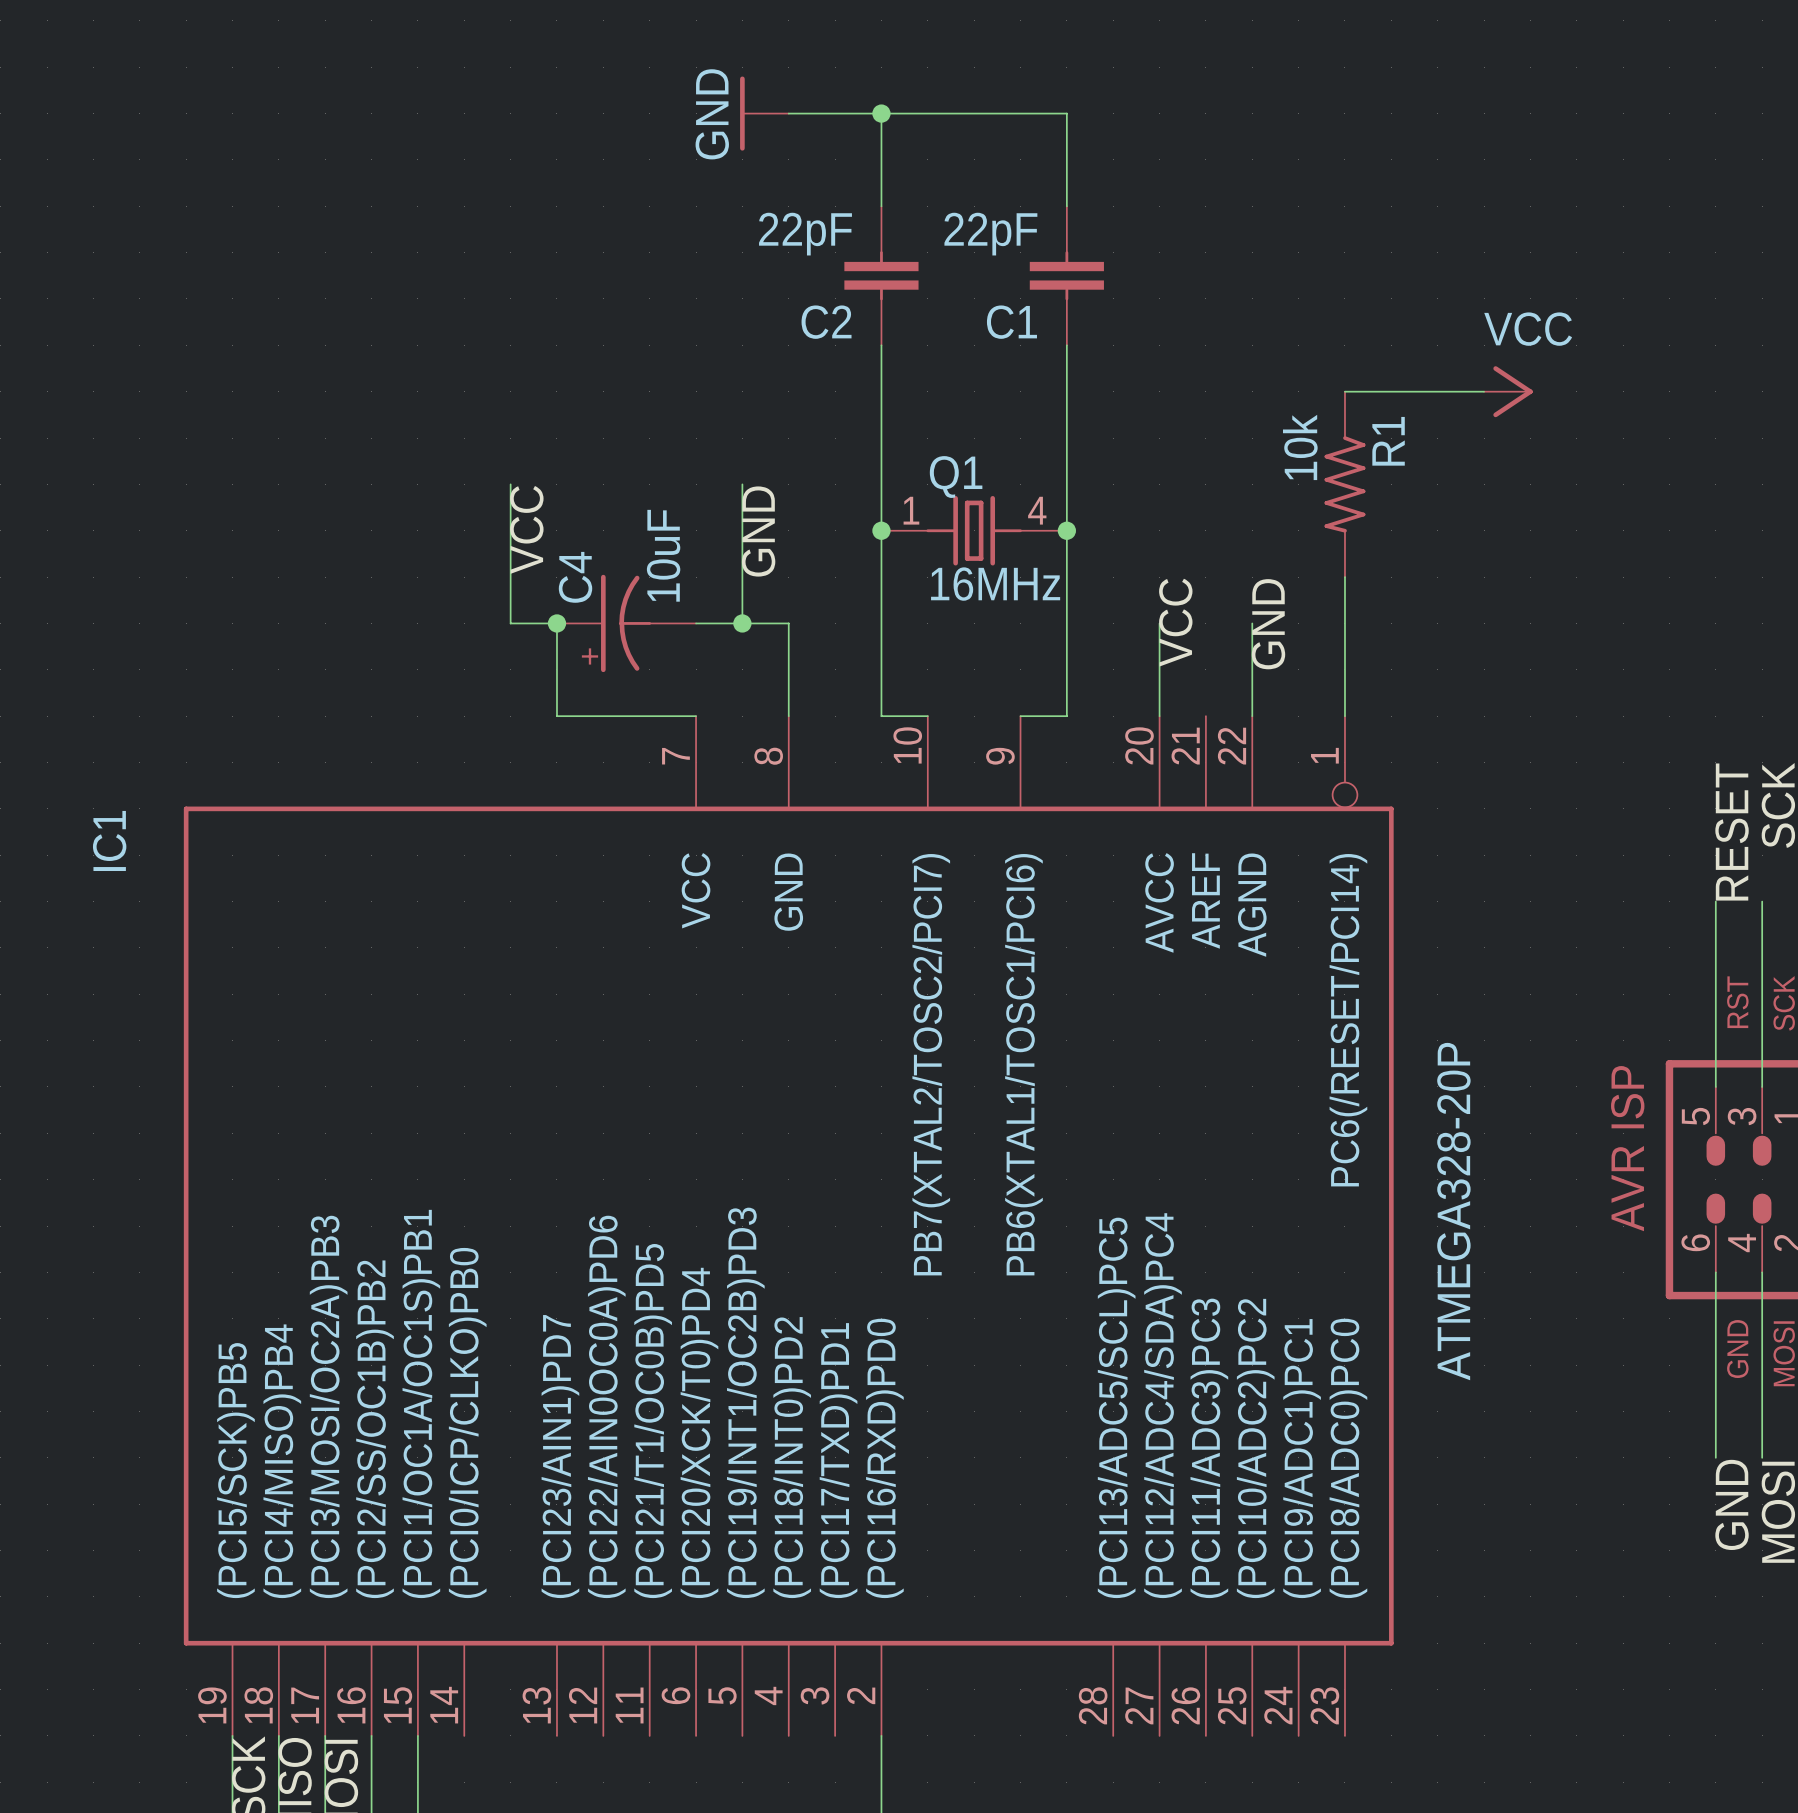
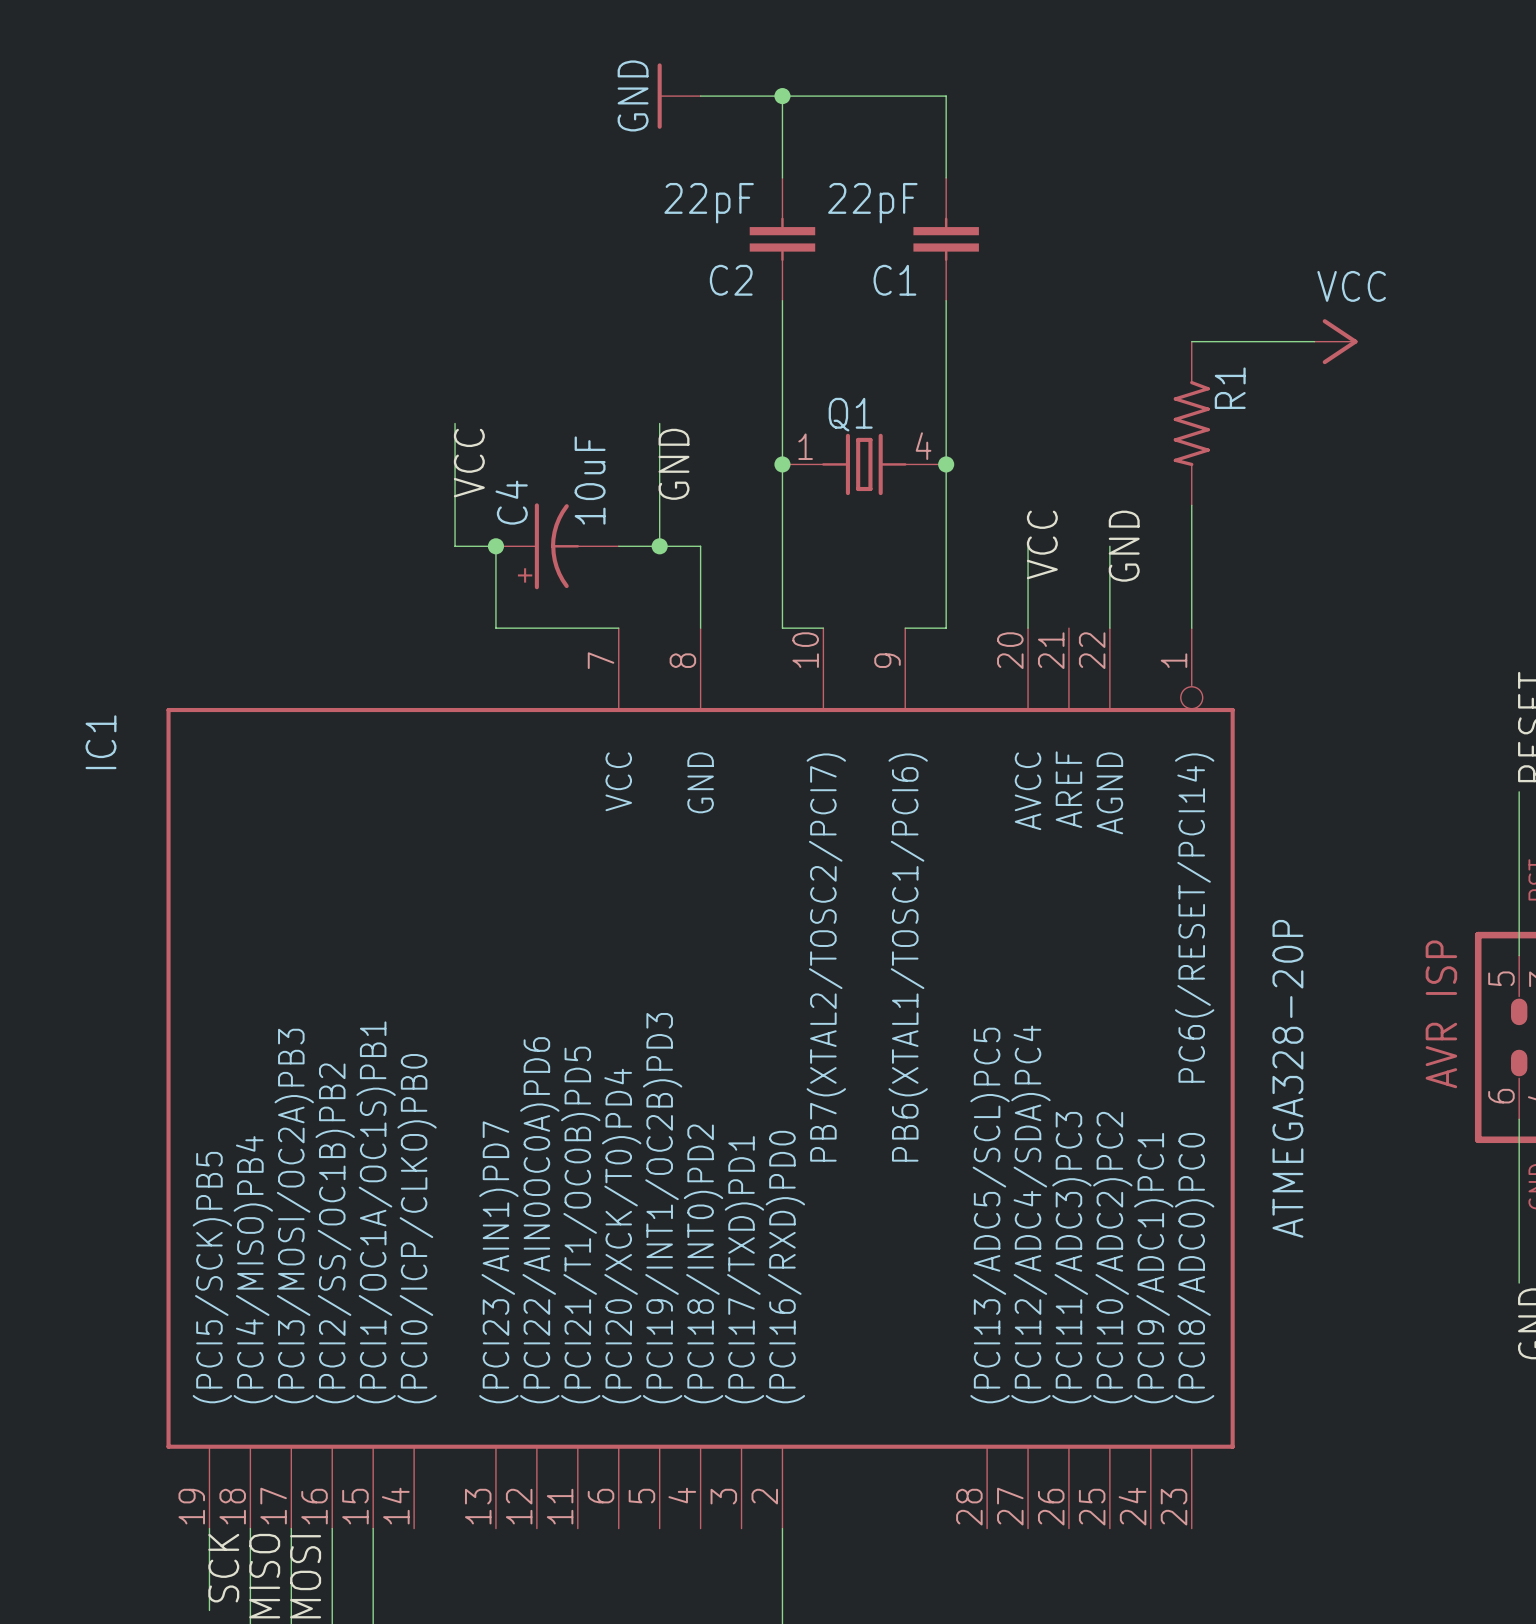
R1 value: 10k (1300, 447) -> none
Q1 value: 16MHz (995, 584) -> none

